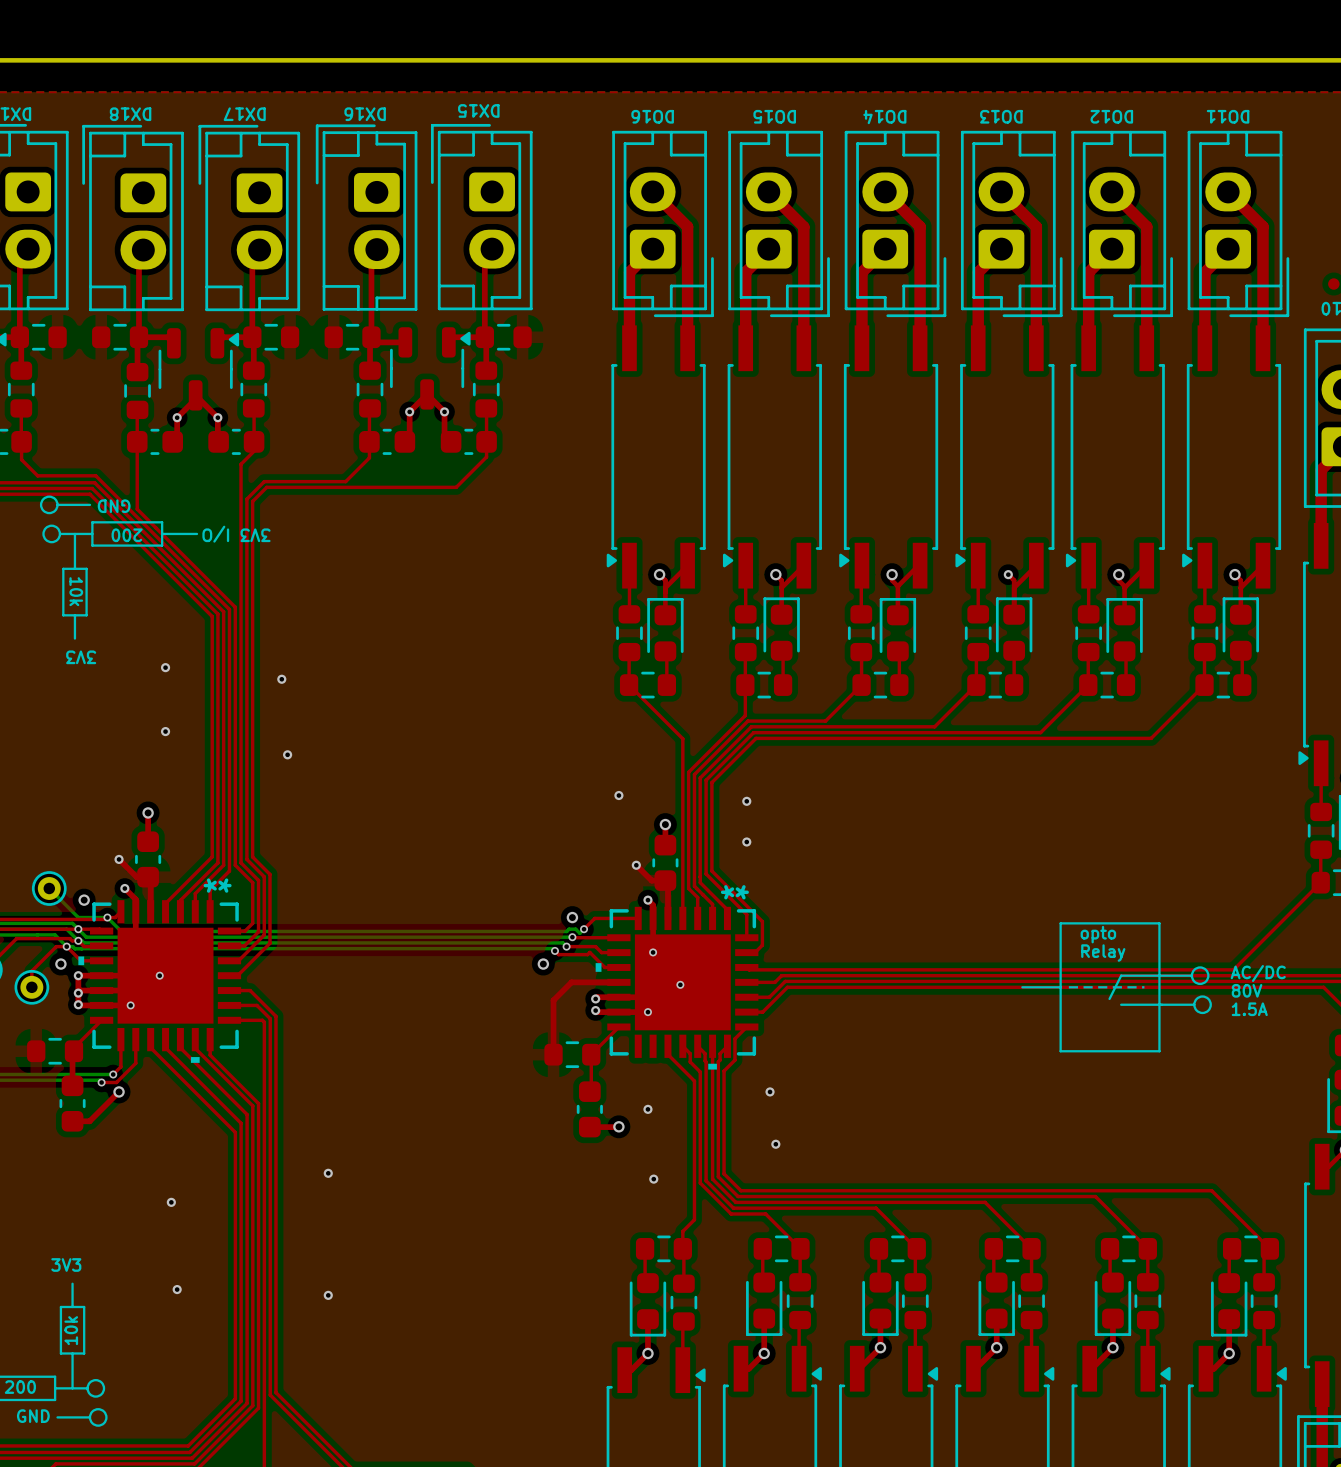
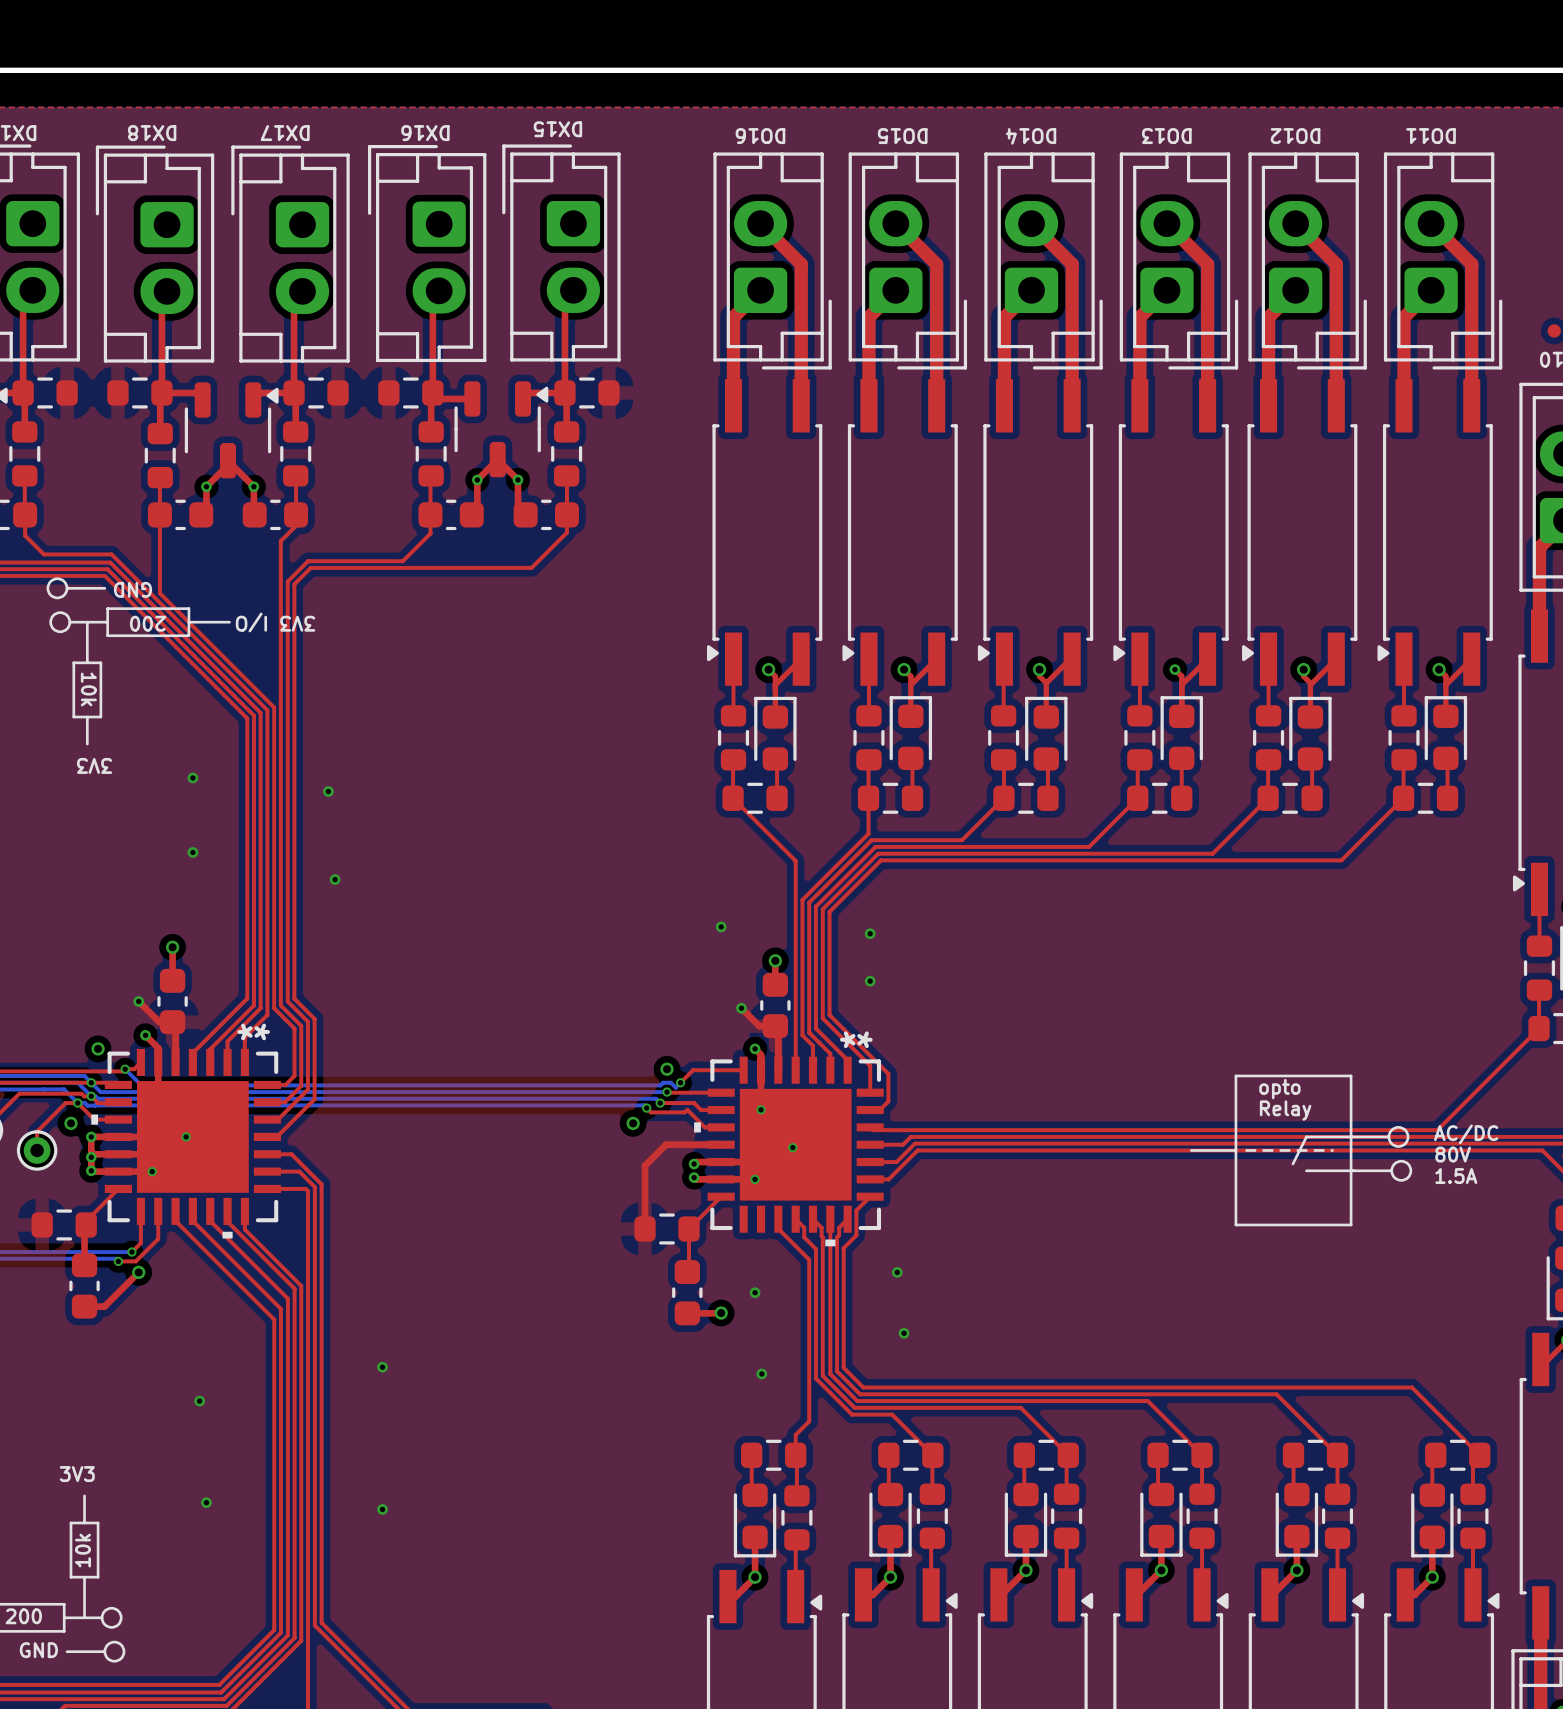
bottom track: (49, 888) (78, 917) (107, 917) -> none
part: (49, 888) -> none

